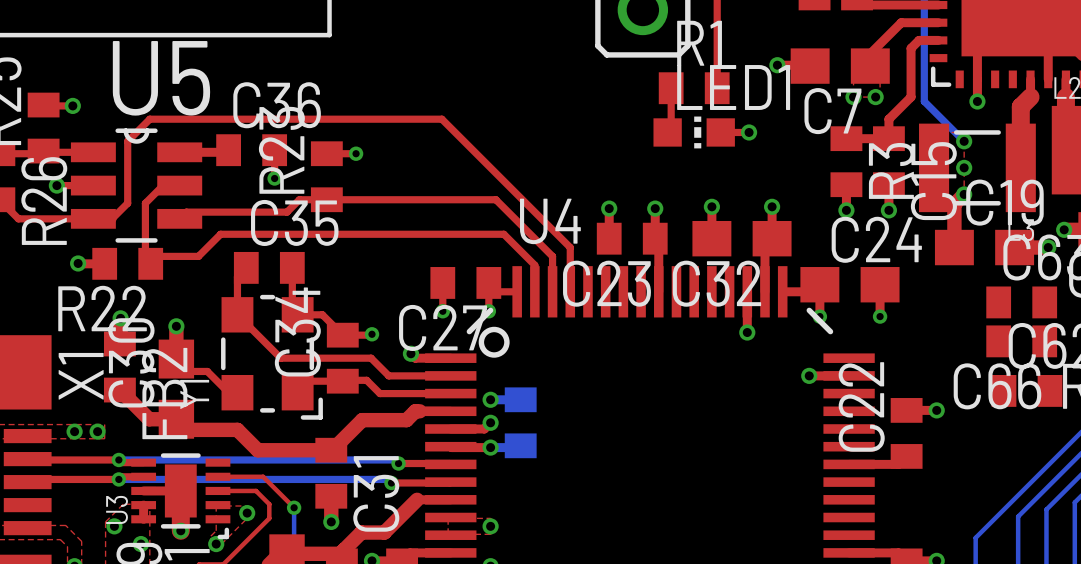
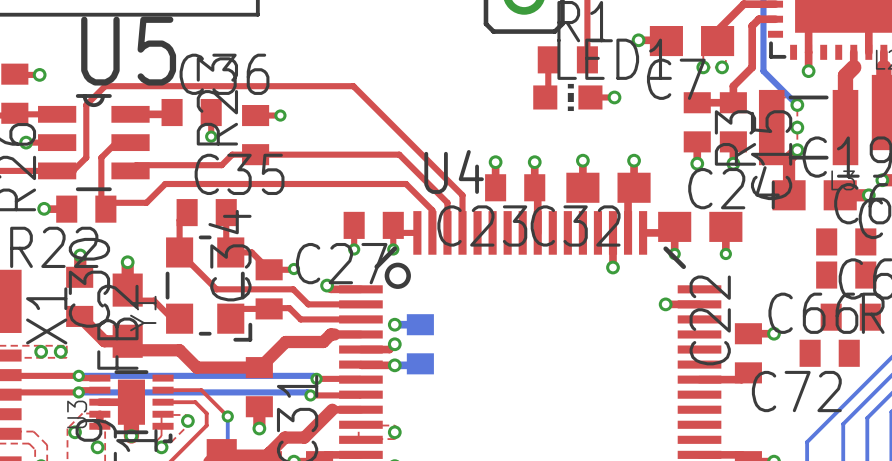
C72: none -> (829, 353)

